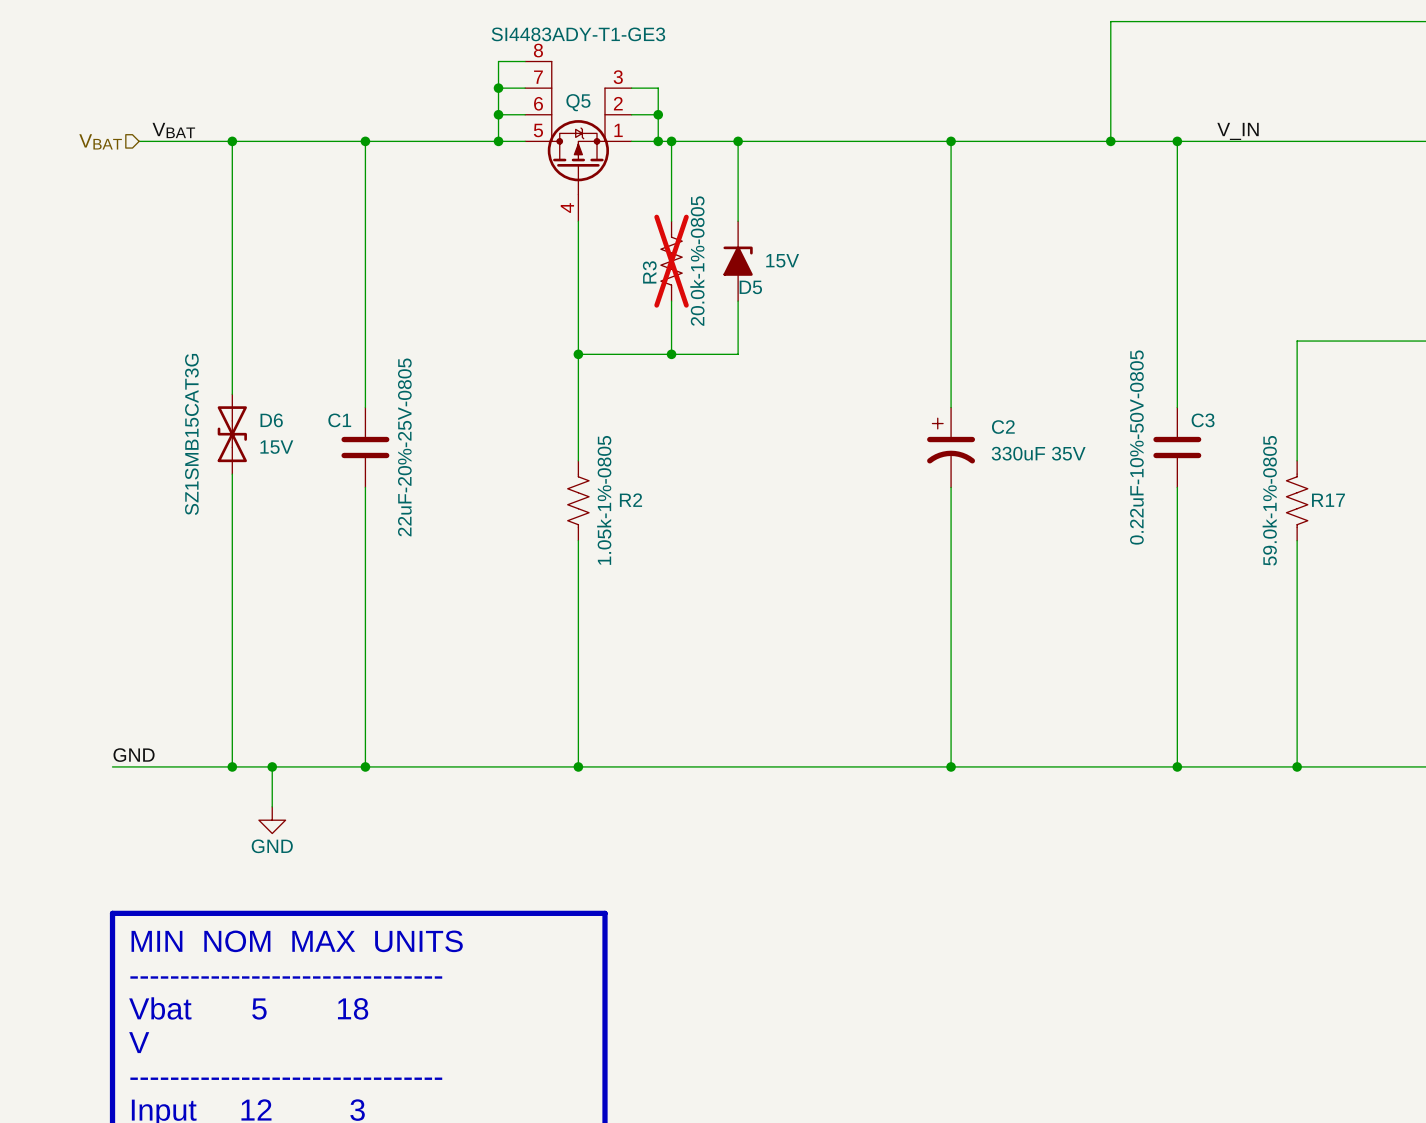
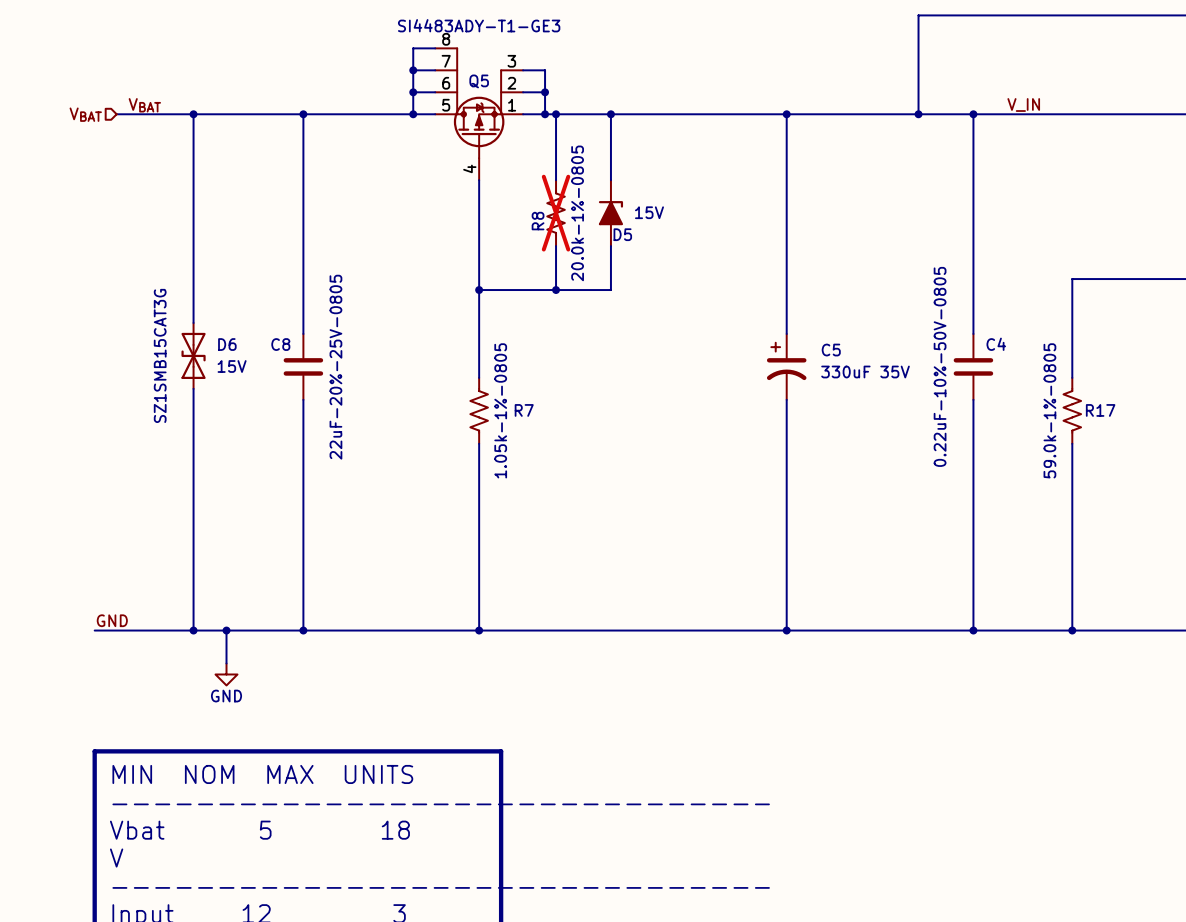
R3 name: R3 (649, 272) -> R8 (538, 221)
C1 name: C1 (339, 420) -> C8 (280, 344)
C3 name: C3 (1203, 420) -> C4 (996, 344)
C2 name: C2 (1003, 427) -> C5 (831, 350)
R2 name: R2 (630, 500) -> R7 (524, 410)

